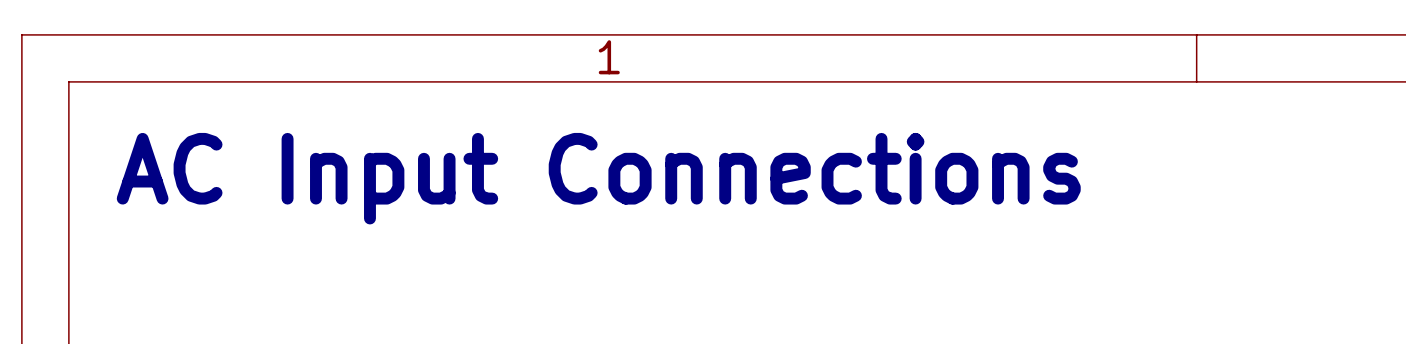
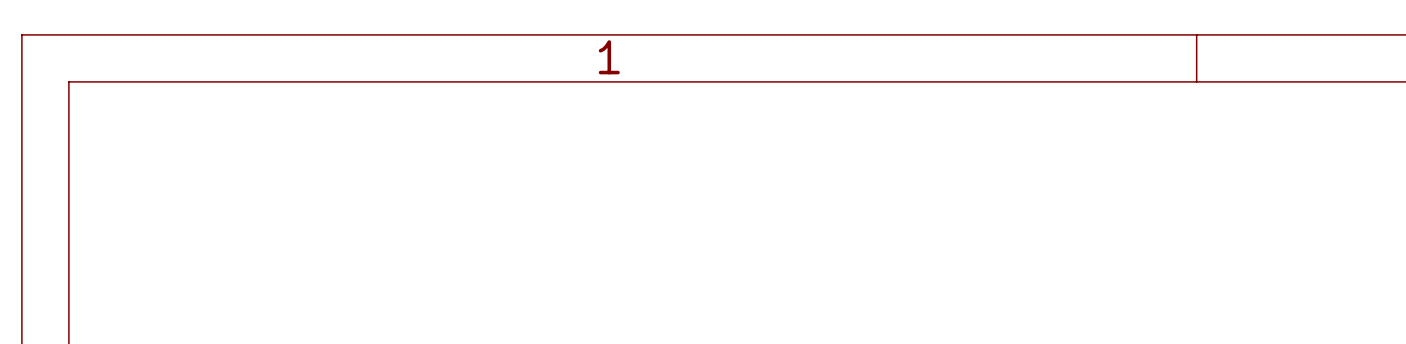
text: AC Input Connections (598, 178) -> none

